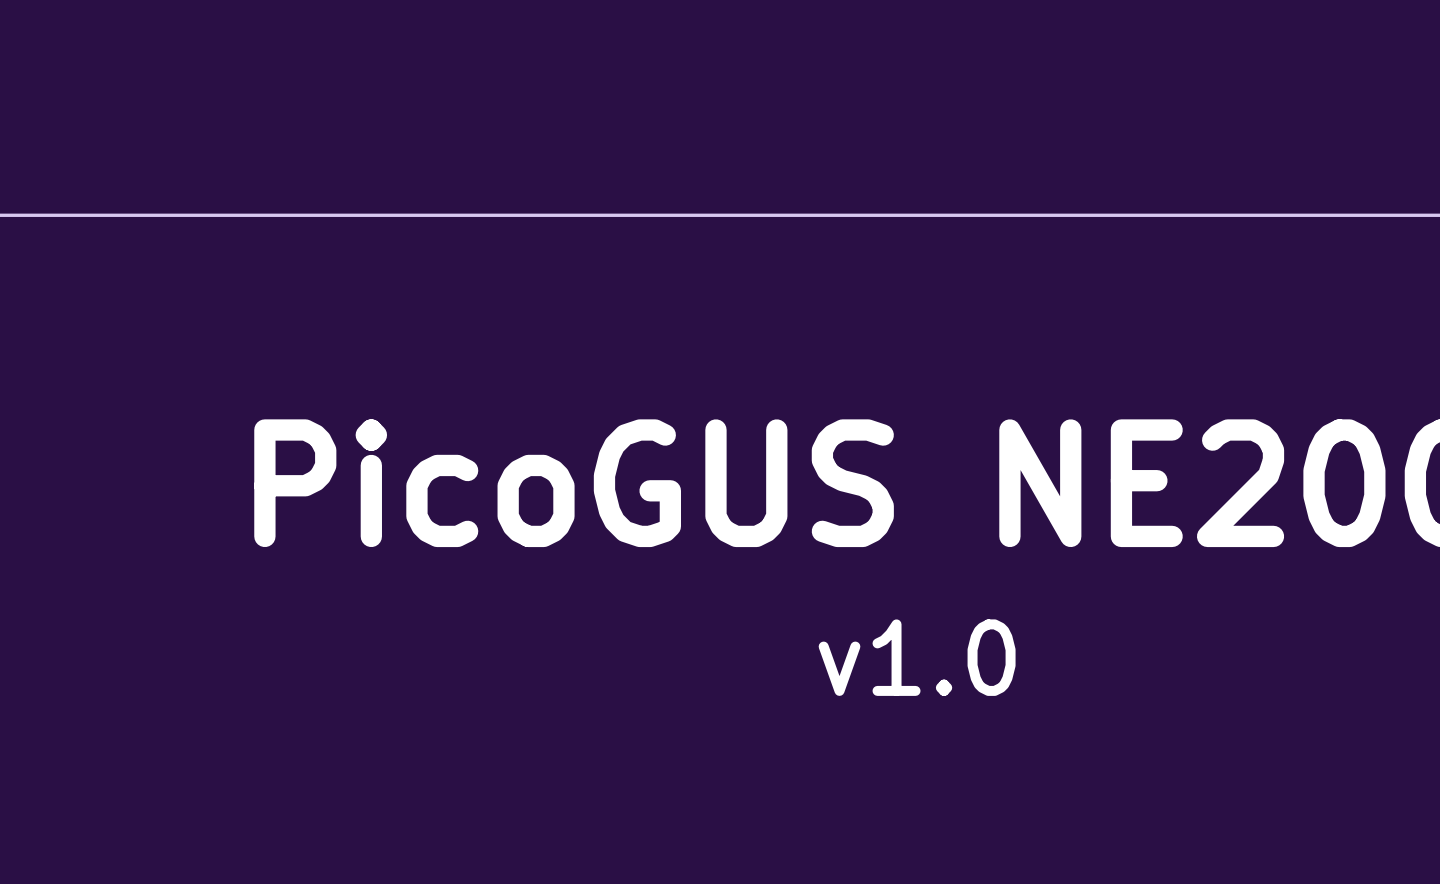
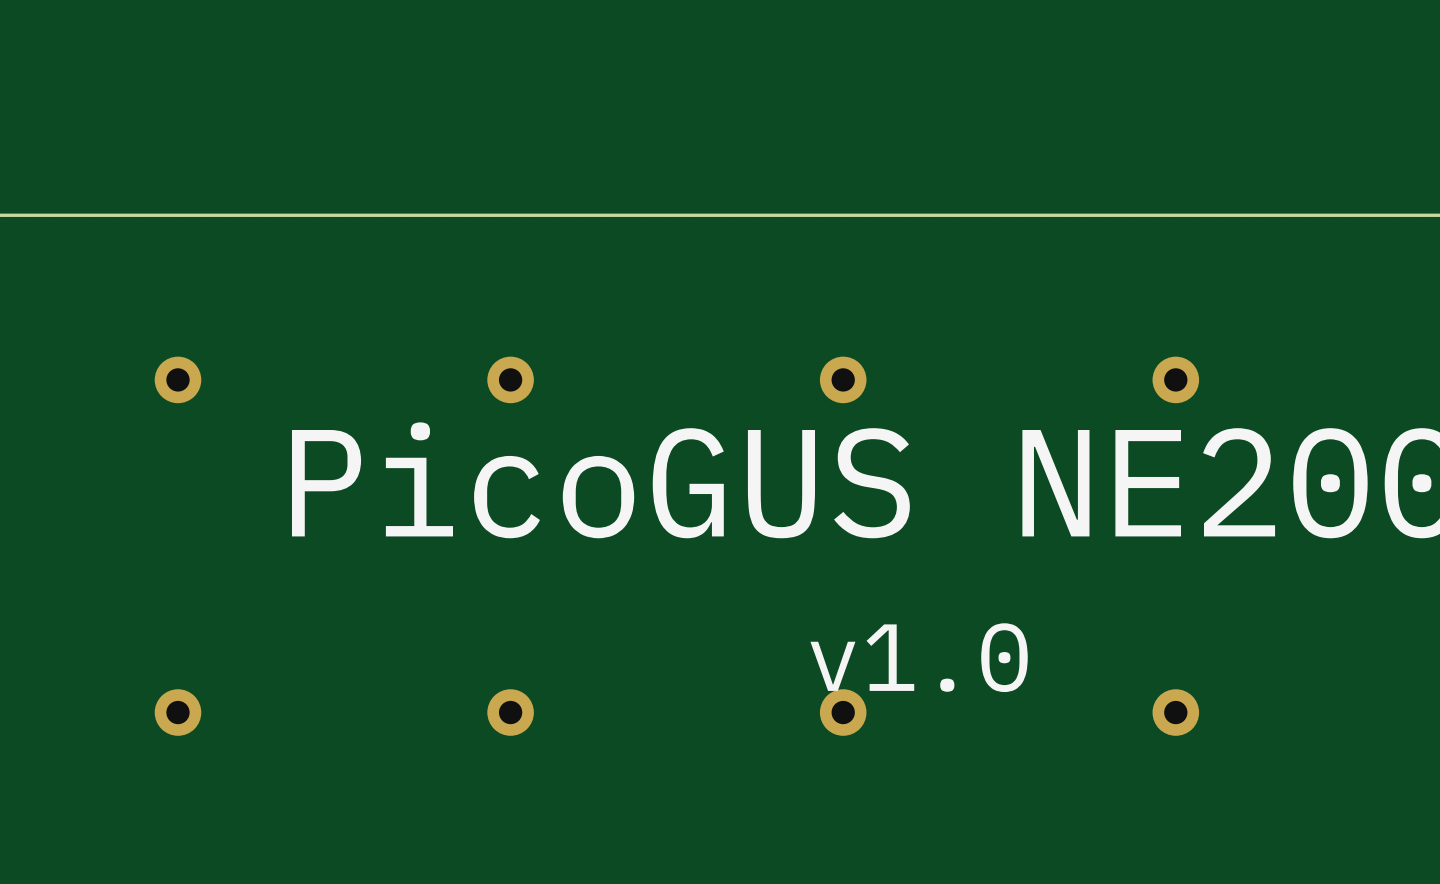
via: none -> (178, 379)
via: none -> (510, 379)
via: none -> (843, 379)
via: none -> (1175, 379)
via: none -> (178, 712)
via: none -> (510, 712)
via: none -> (843, 712)
via: none -> (1175, 712)

